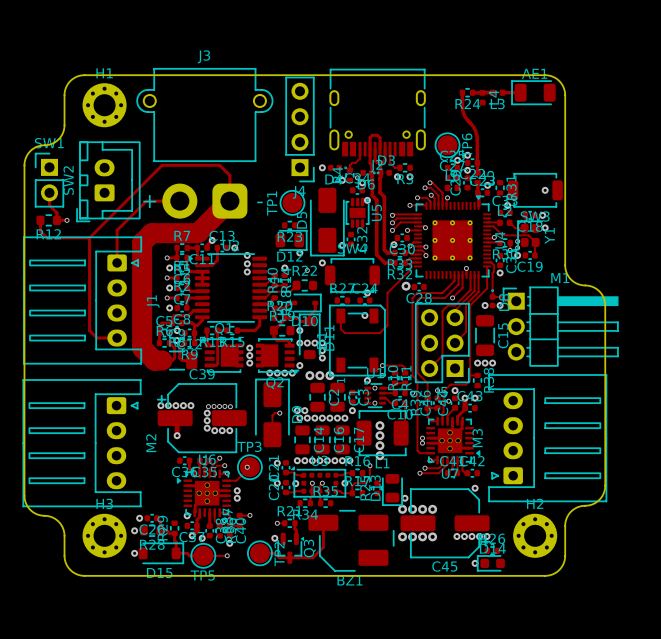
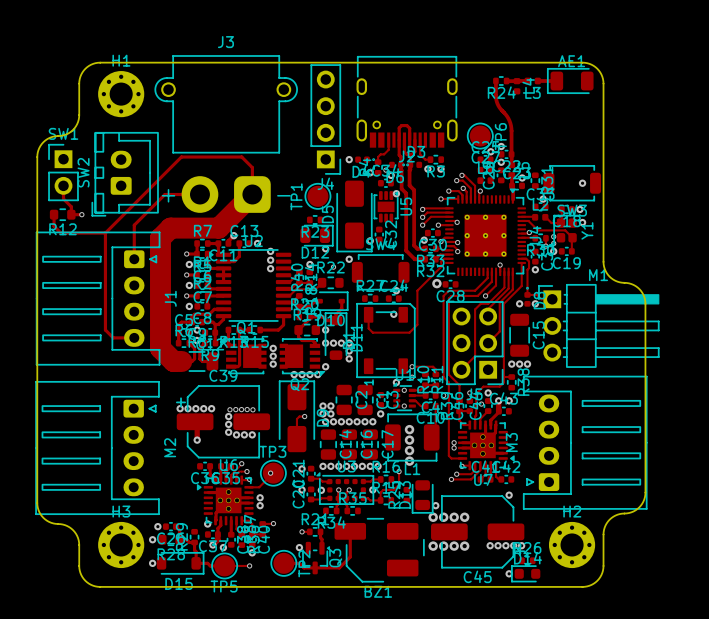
via: (309, 375) -> none
via: (319, 375) -> none
via: (329, 375) -> none
via: none -> (323, 406)
via: none -> (330, 406)

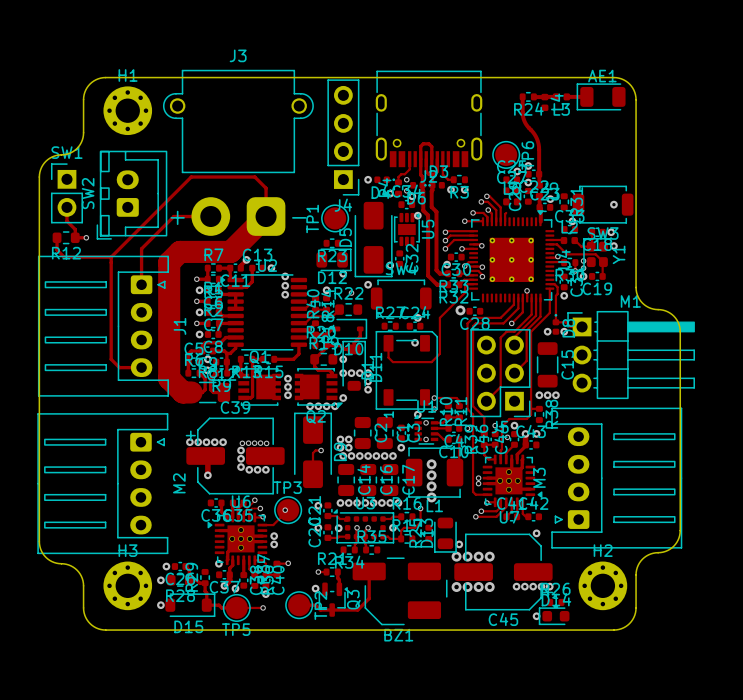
via: none -> (406, 179)
via: (480, 191) -> none

